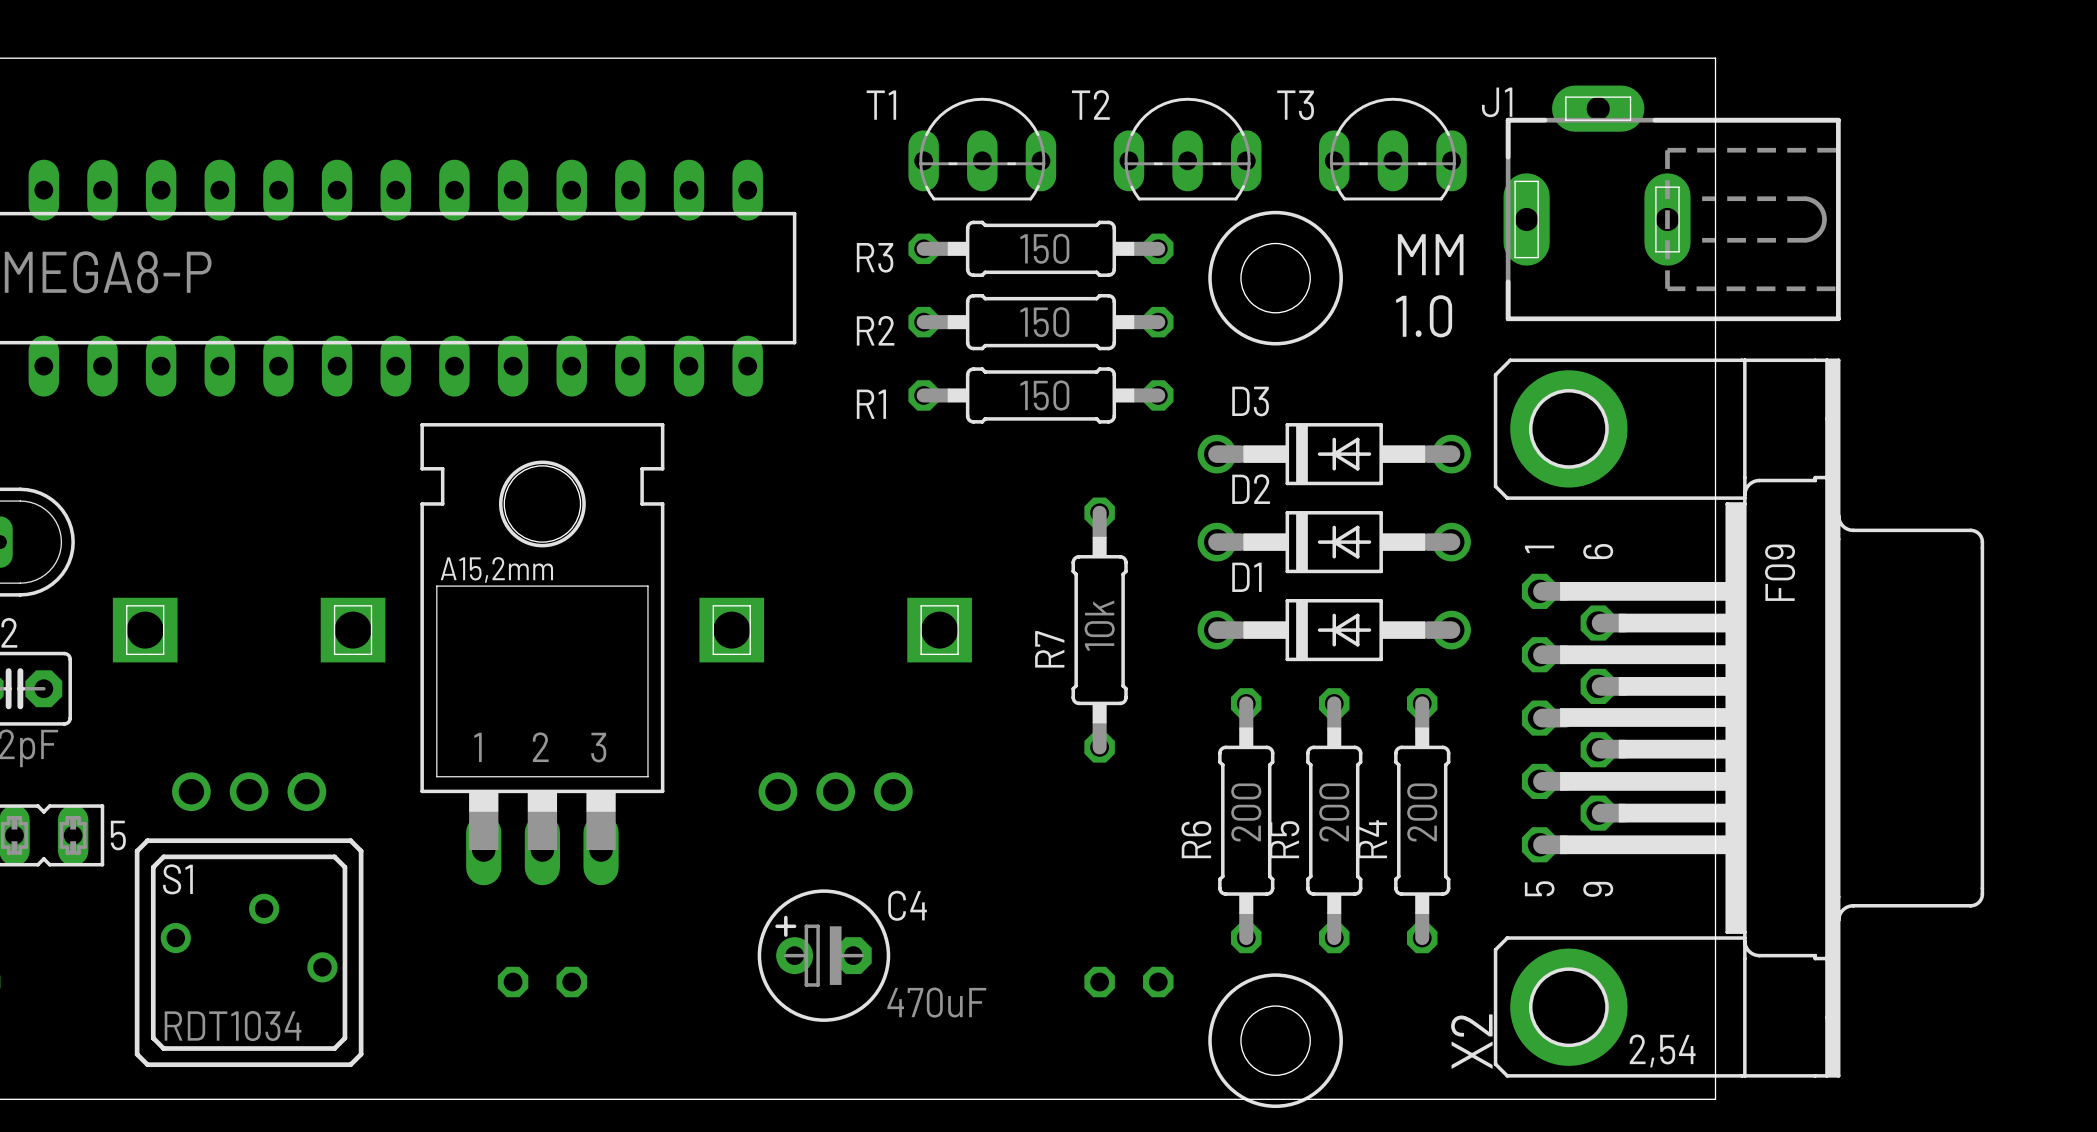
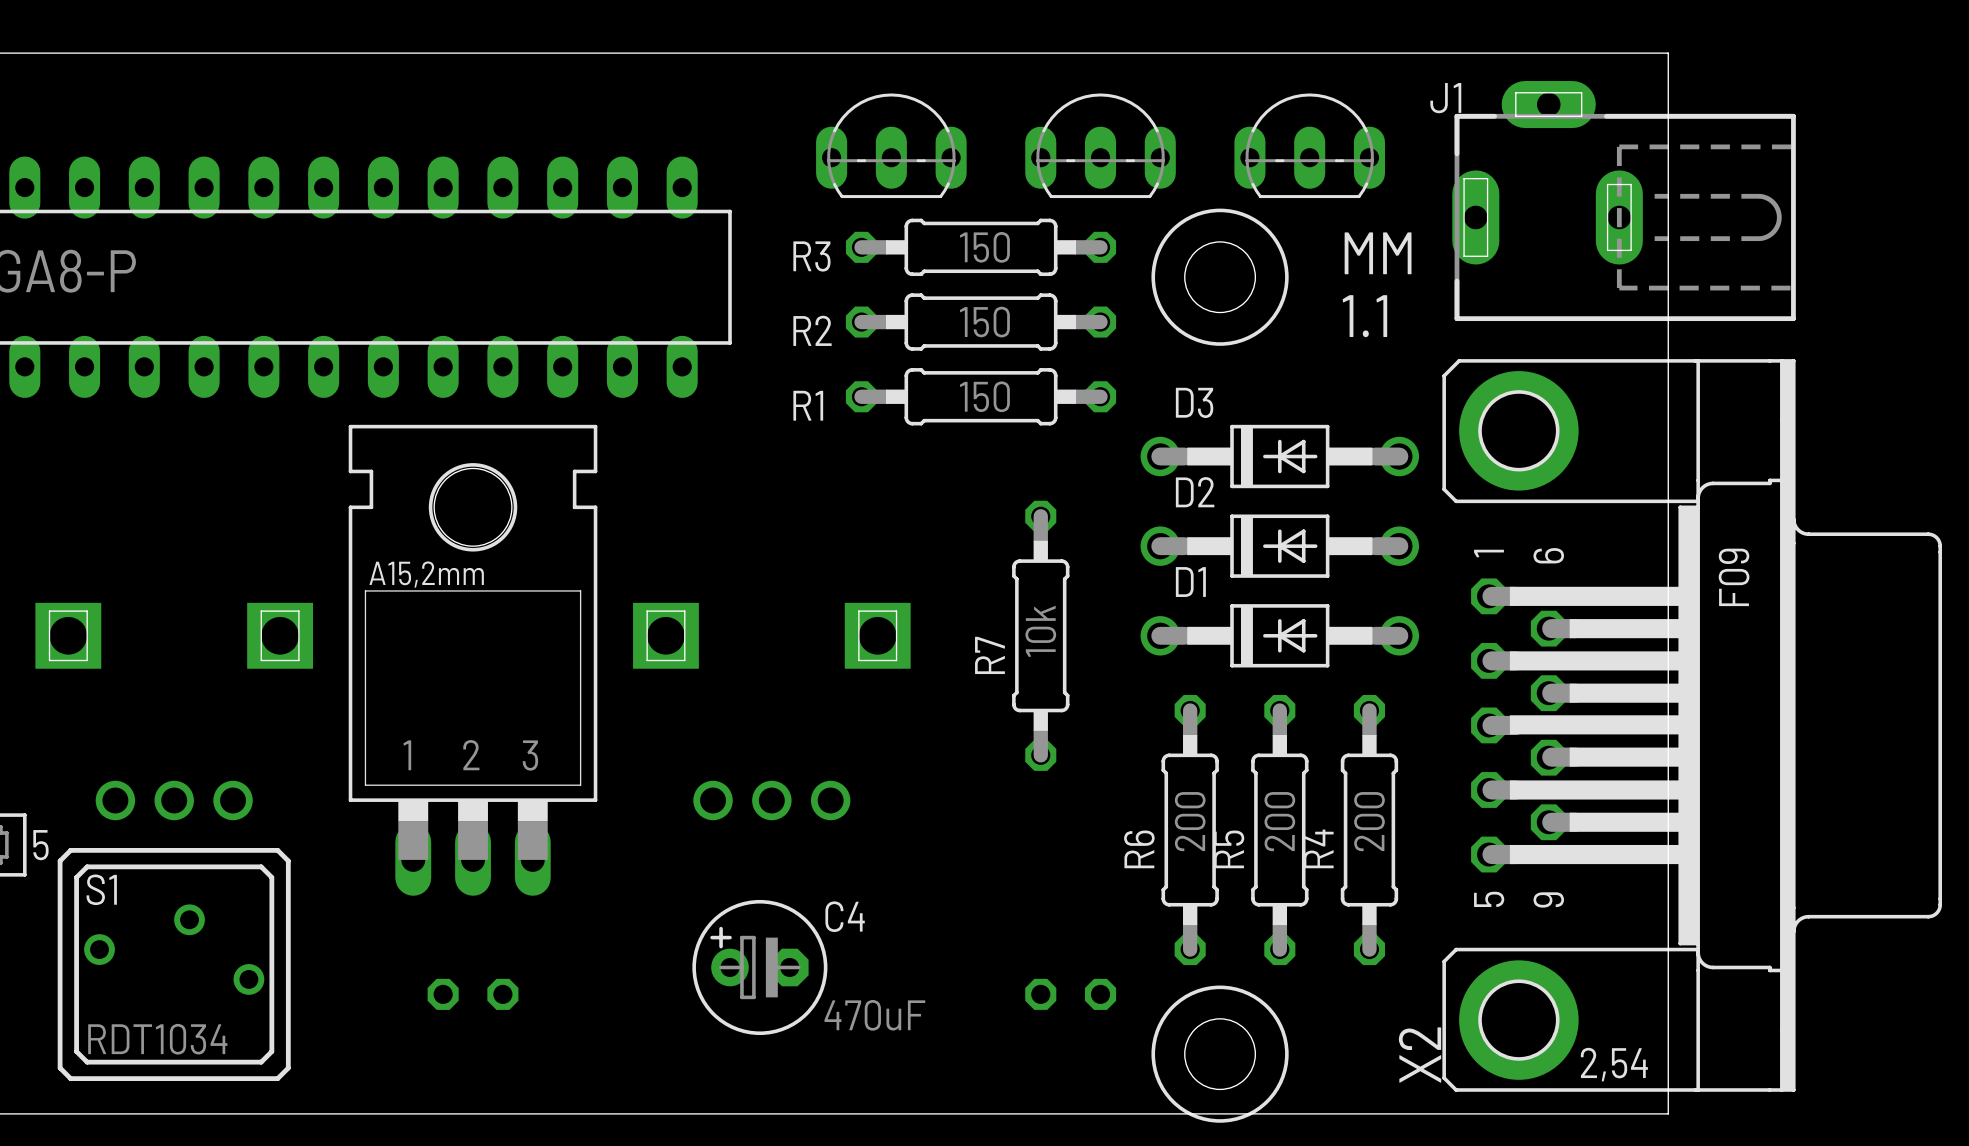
part: none -> (891, 145)
T1: (982, 149) -> none
part: none -> (1100, 145)
T2: (1187, 149) -> none
part: none -> (1309, 145)
T3: (1392, 149) -> none
text: 1.0 (1424, 316) -> 1.1 (1364, 316)

